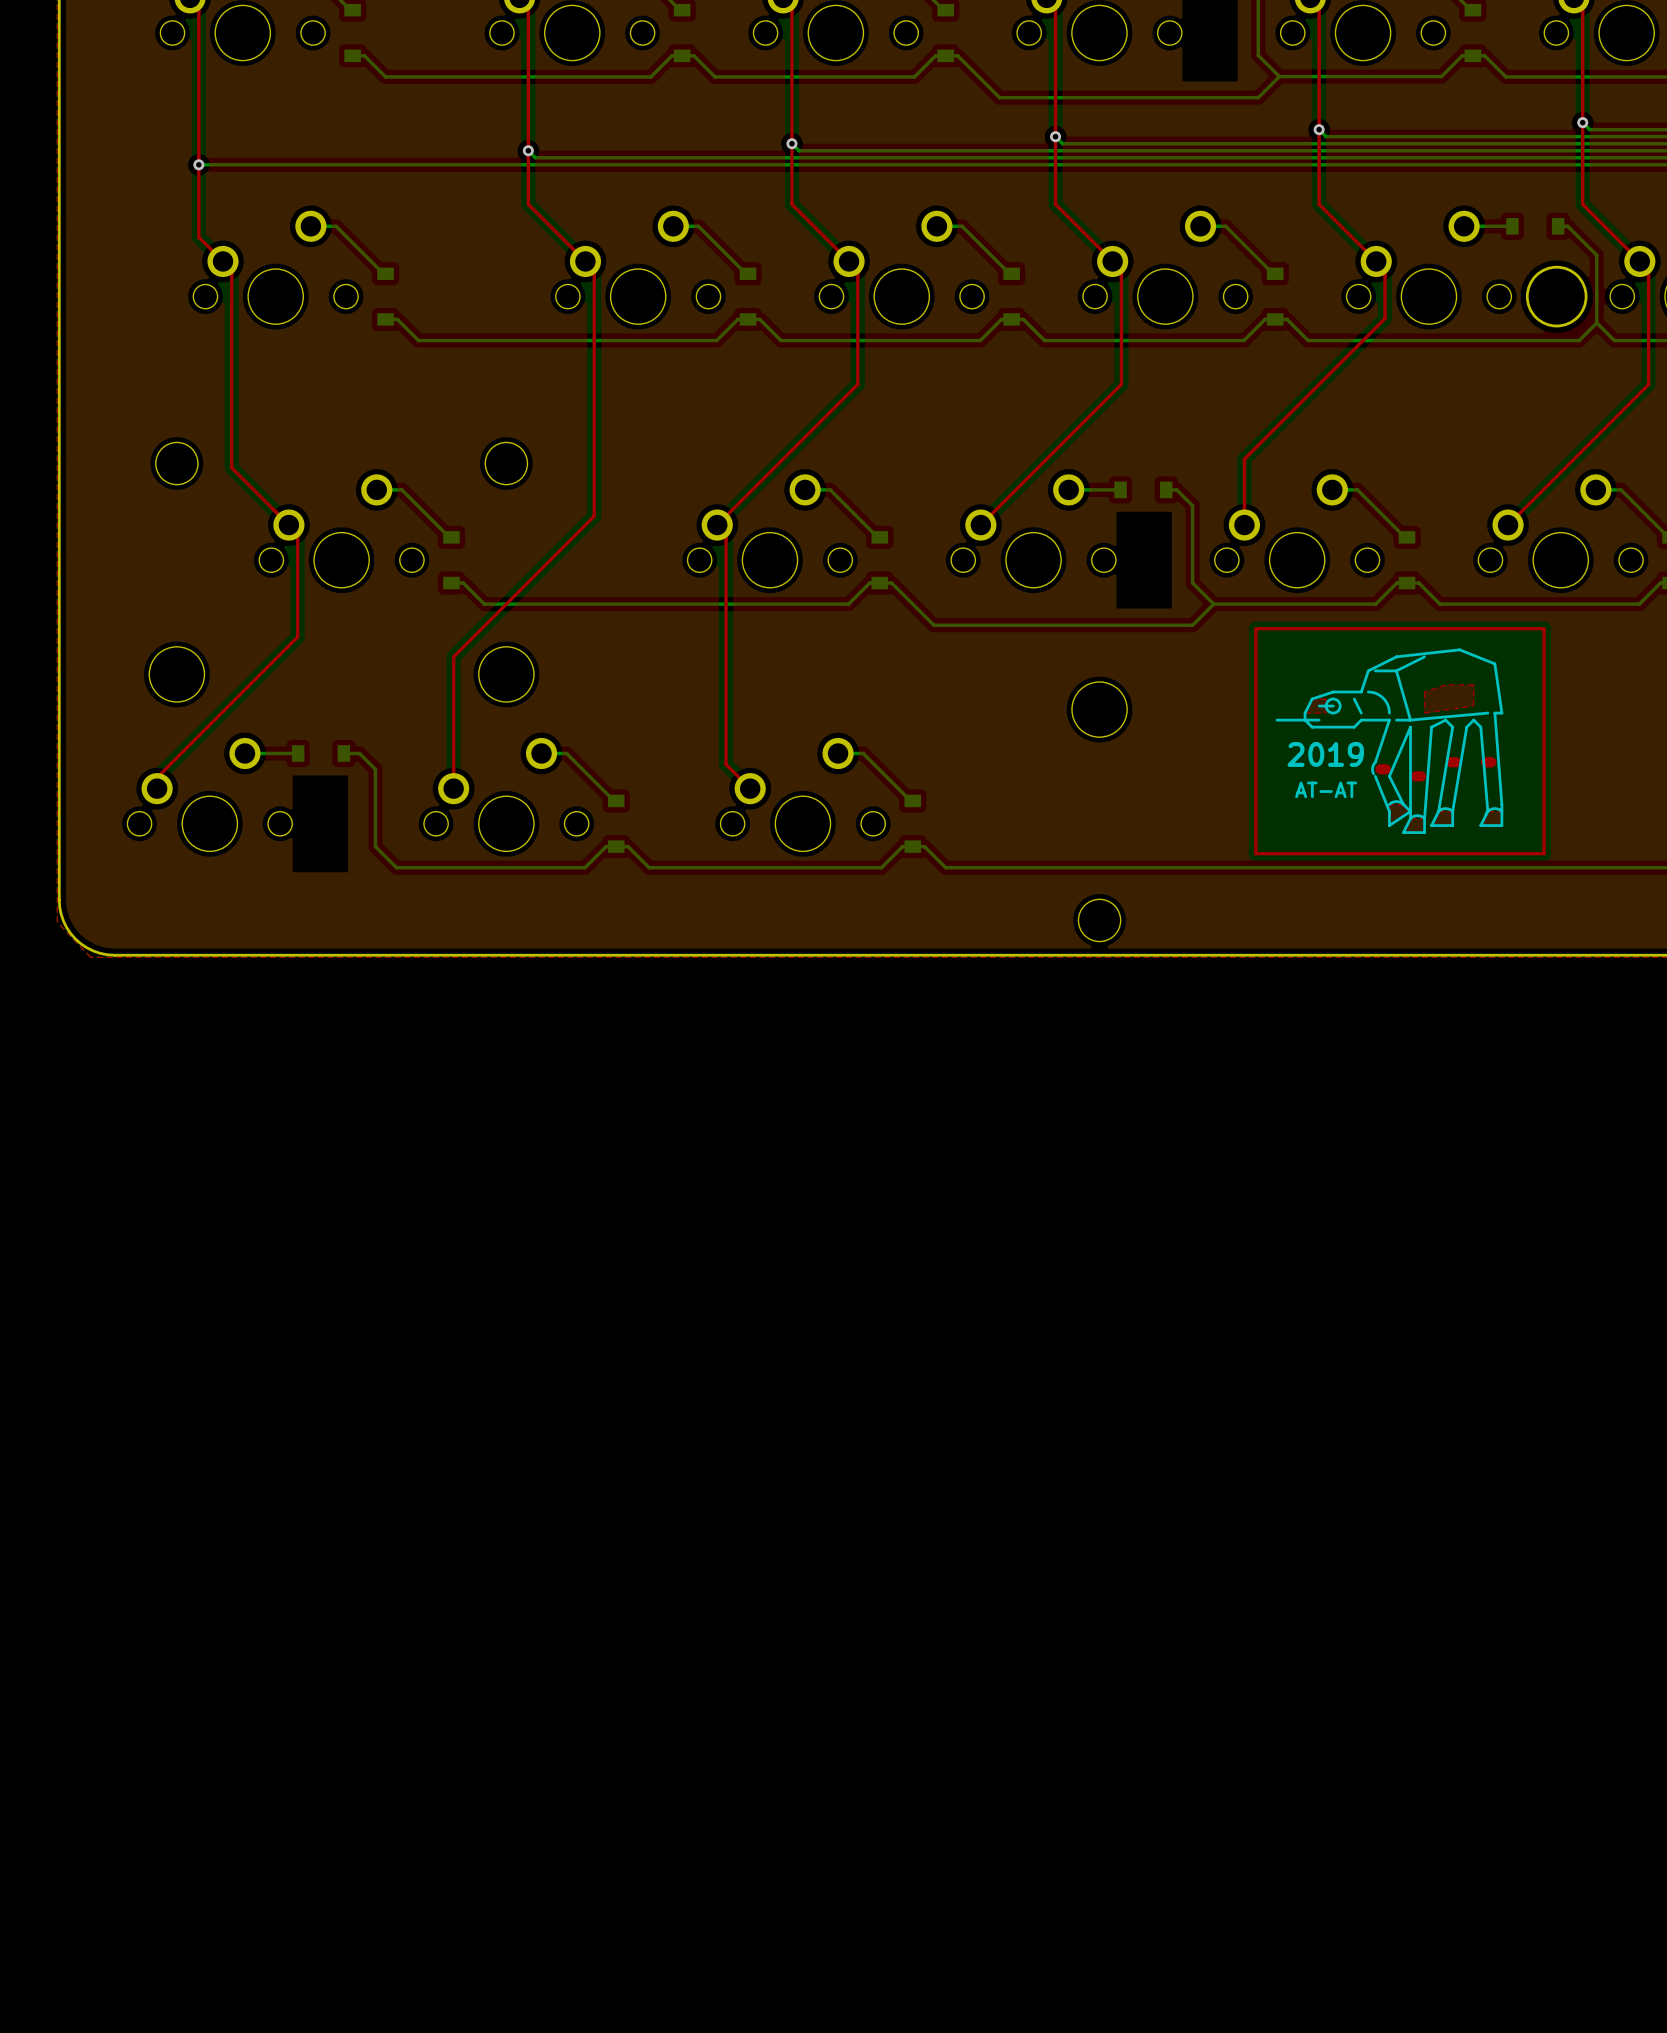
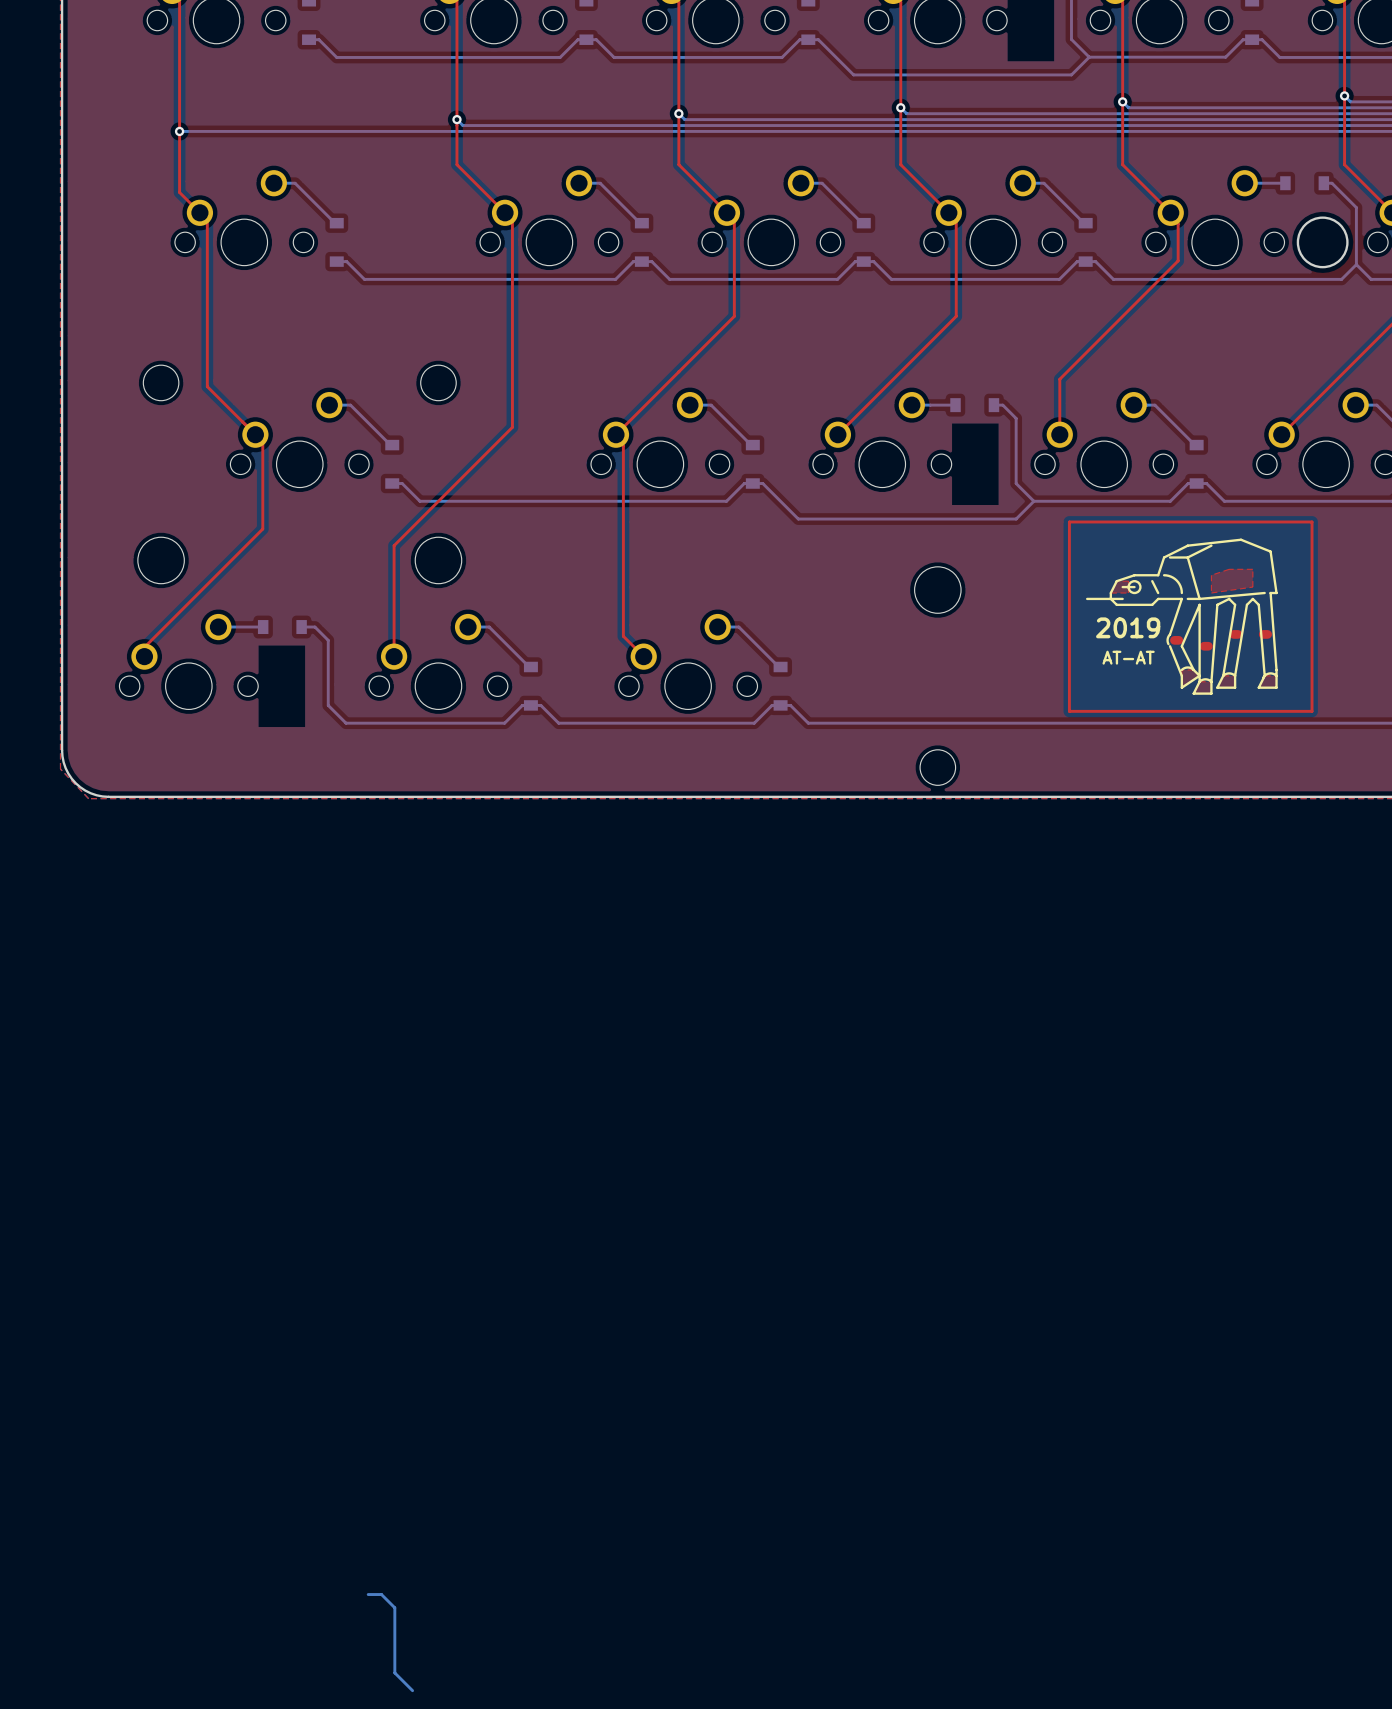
bottom track: none -> (368, 1594) (381, 1594) (394, 1607) (394, 1672) (412, 1690)

